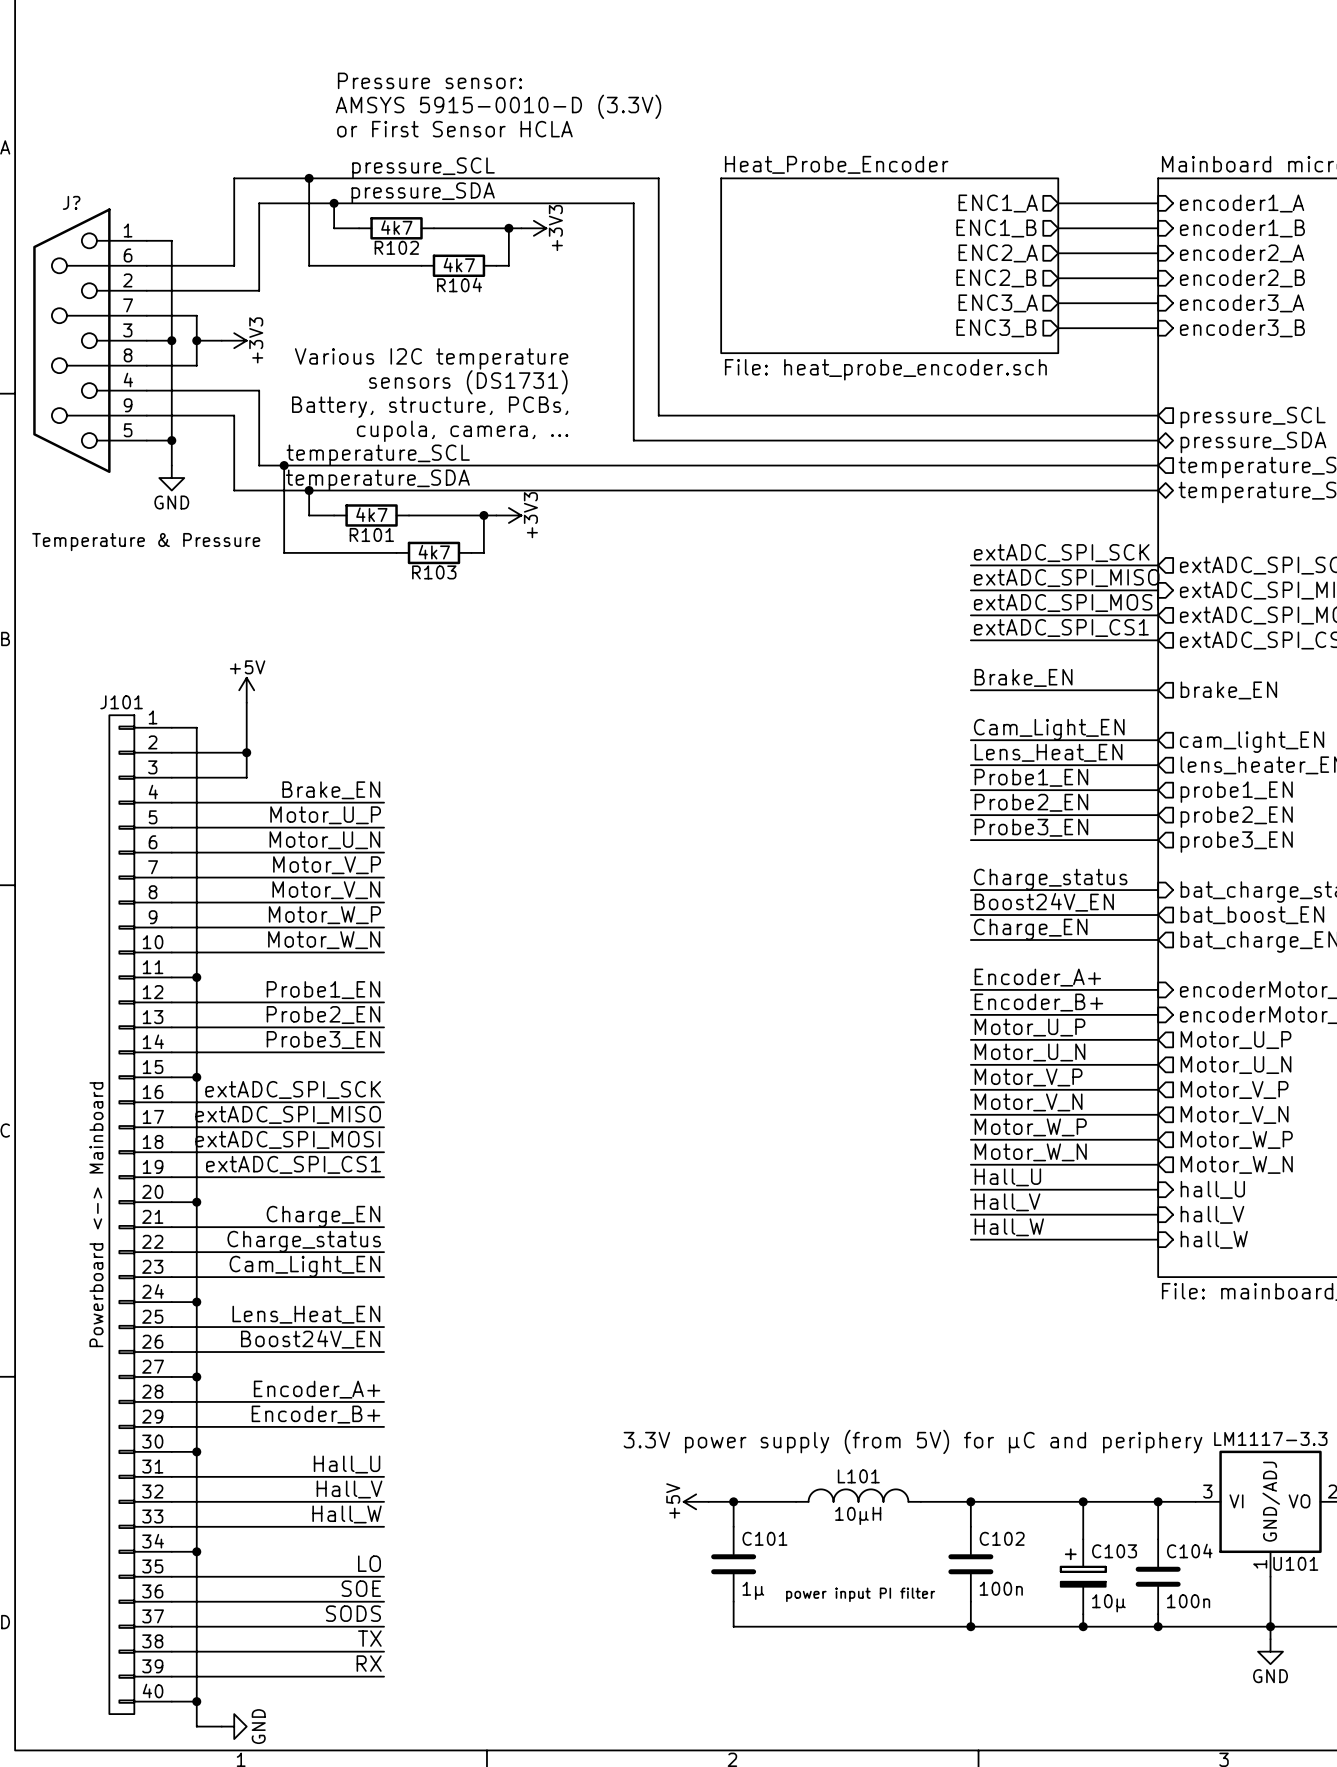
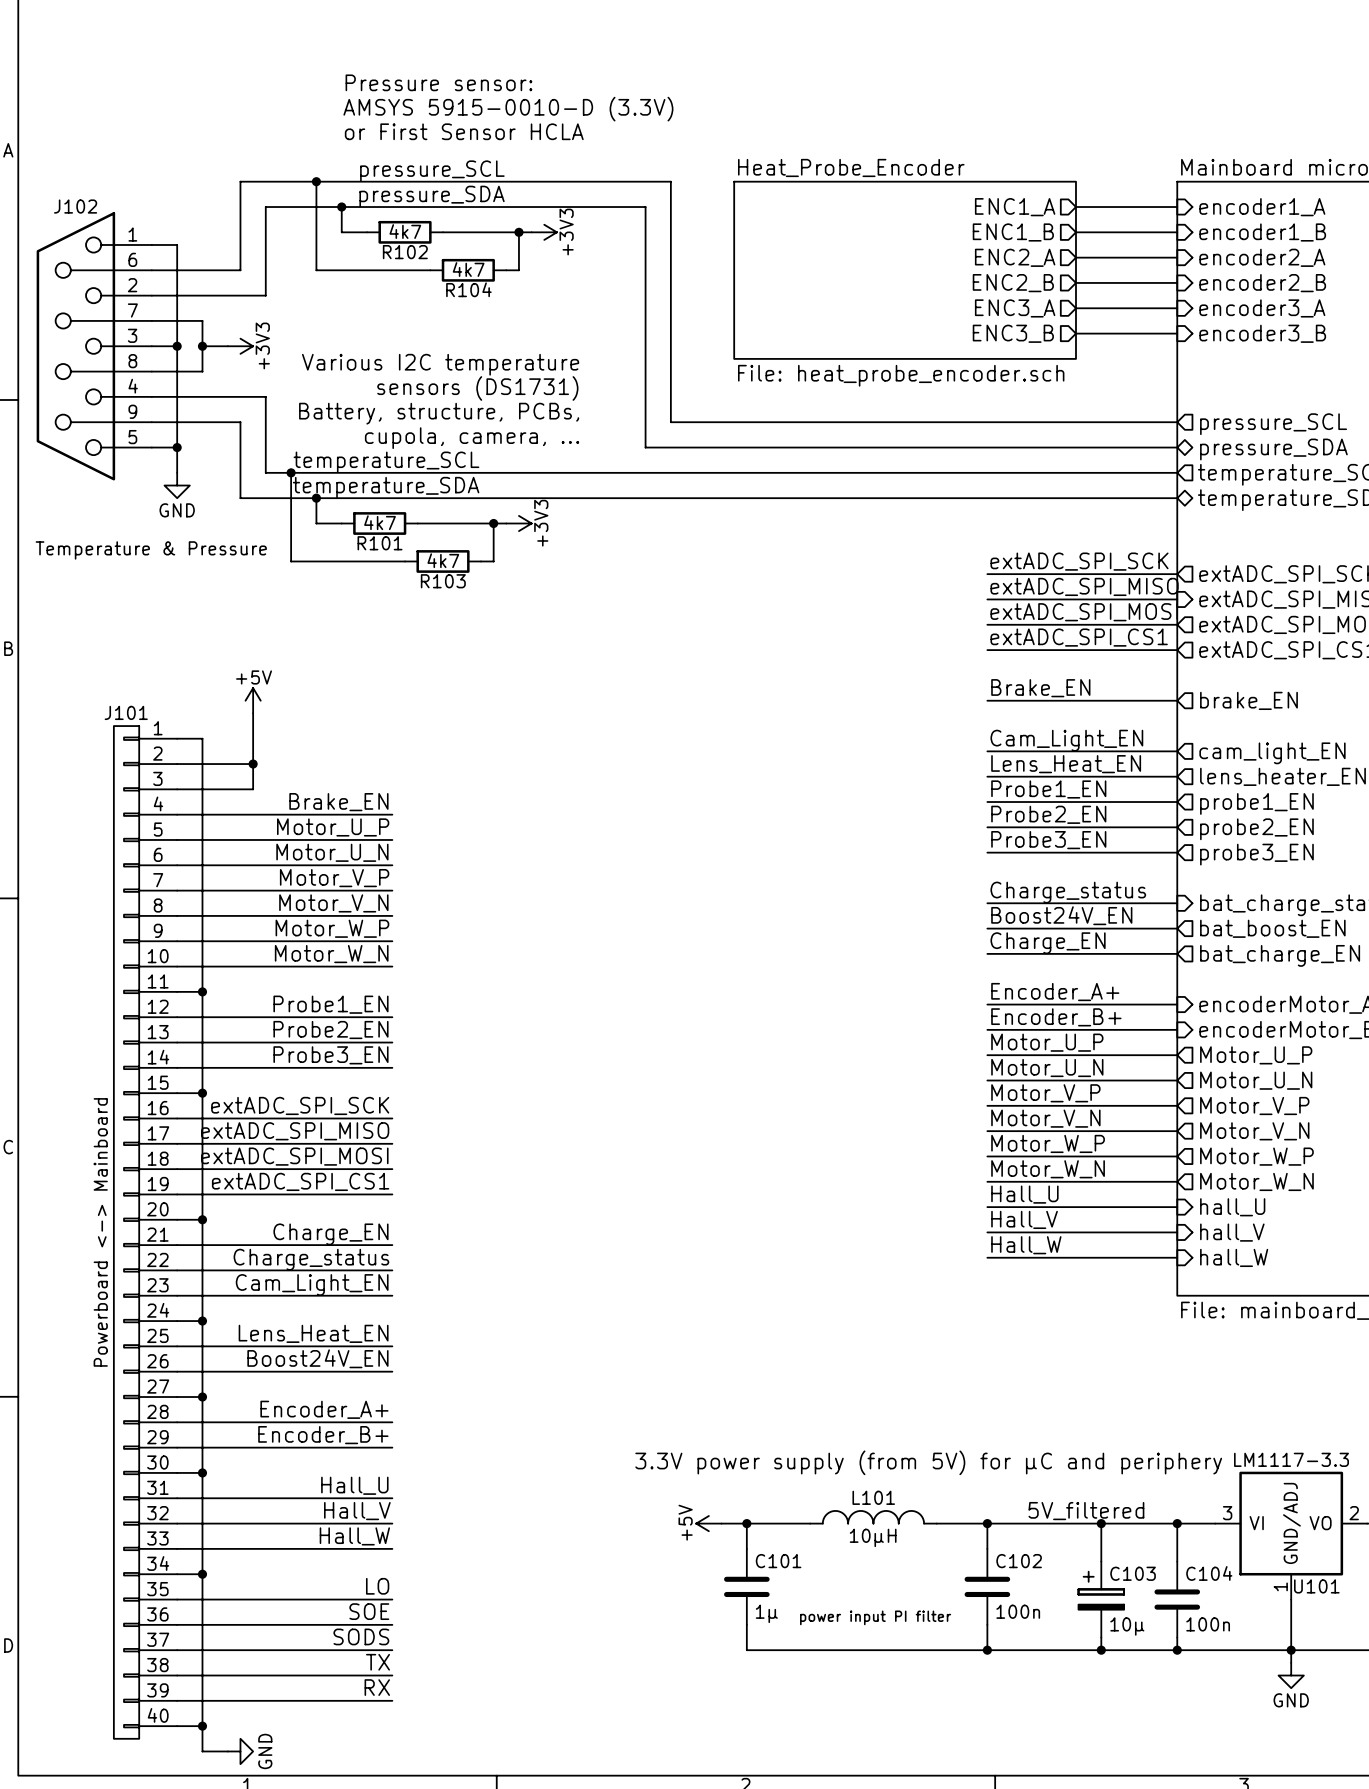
J? name: J? (71, 202) -> J102 (75, 206)
label: none -> 5V_filtered (1086, 1511)

